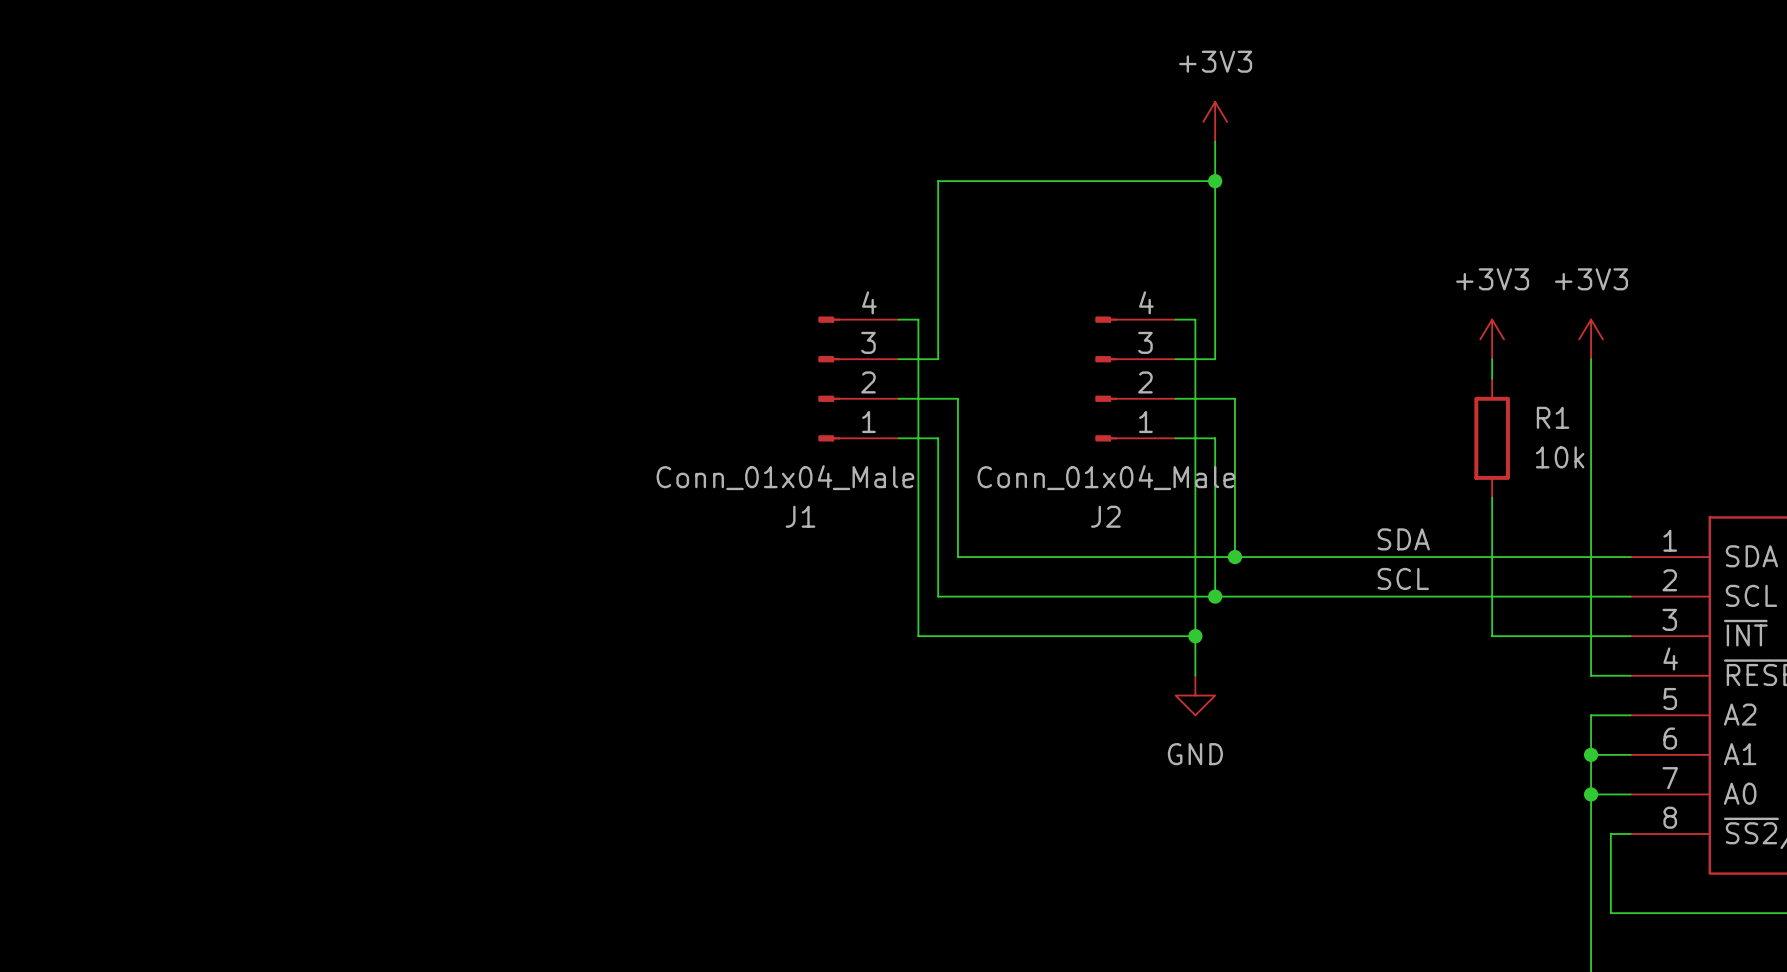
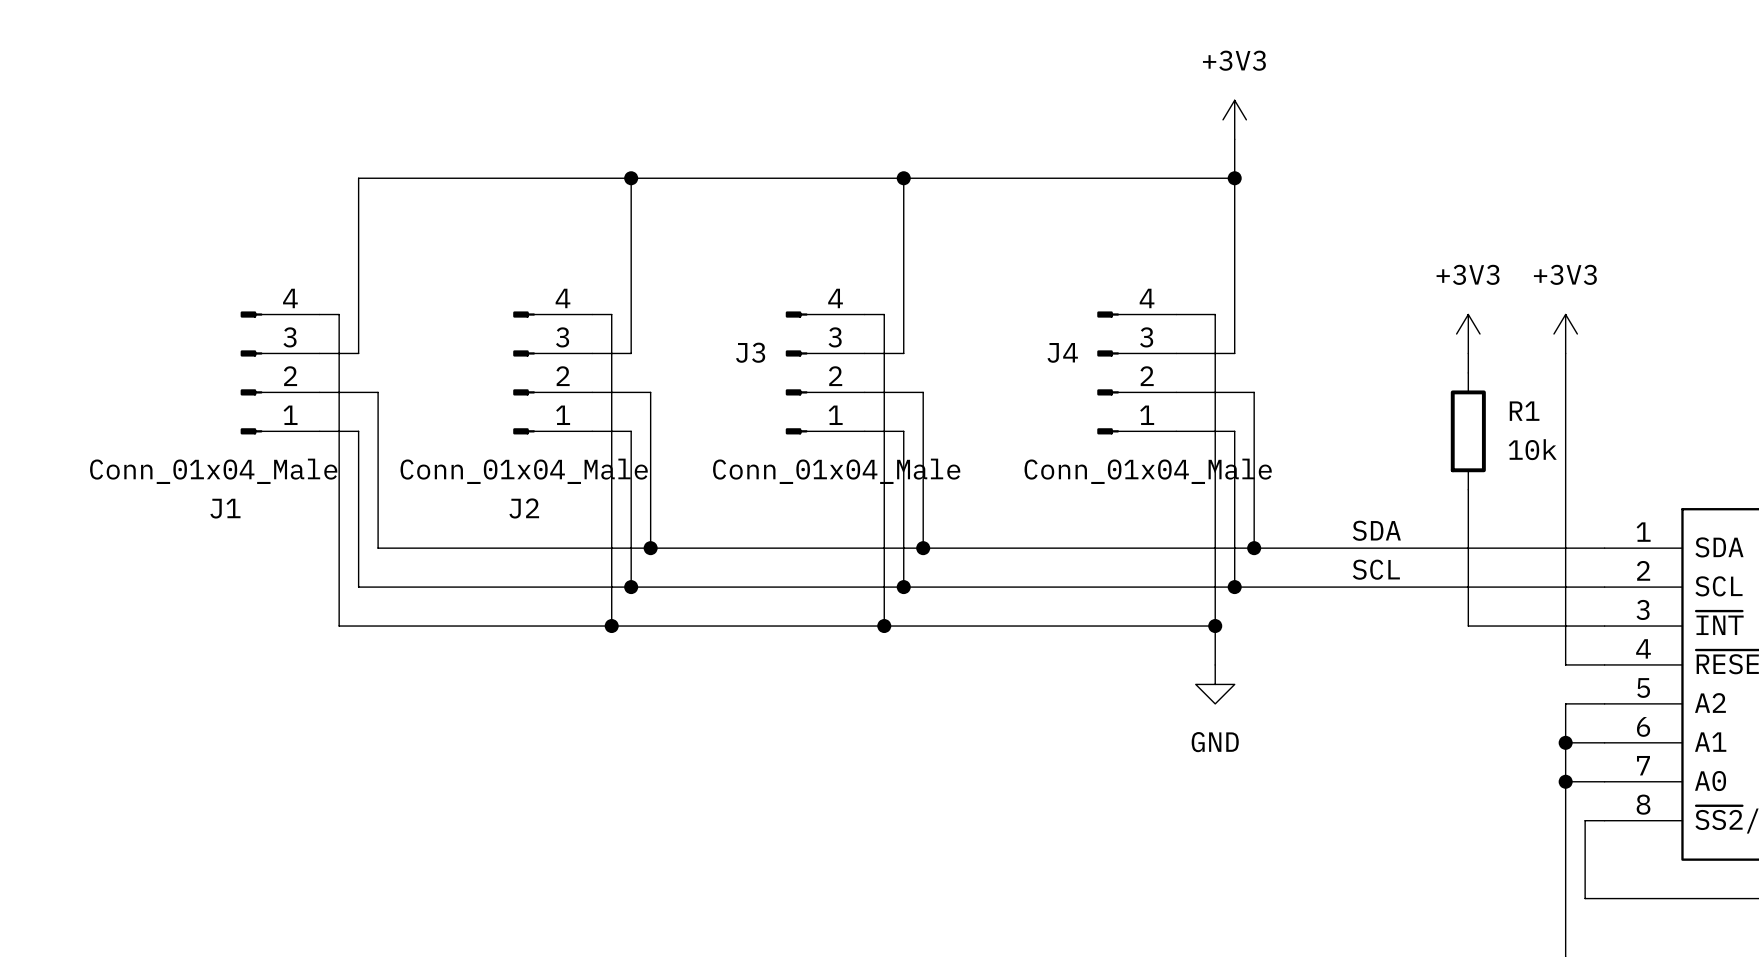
power symbol position: +3V3 (1215, 121) -> +3V3 (1234, 119)
wire: (1215, 141) (1215, 359) -> (1234, 139) (1234, 353) (1195, 353)
wire: none -> (631, 178) (631, 353) (592, 353)
junction: none -> (631, 178)
junction: none -> (903, 178)
wire: (938, 181) (938, 359) (918, 359) (918, 438) (938, 438) -> (923, 178) (358, 178) (358, 353) (319, 353)
wire: none -> (1195, 178) (1234, 178)
junction position: (1215, 181) -> (1234, 178)
wire: none -> (592, 314) (611, 314) (611, 626)
wire: none -> (864, 314) (884, 314) (884, 626)
wire: (898, 319) (918, 319) -> (903, 178) (903, 314)
wire: (1175, 319) (1195, 319) (1195, 675) -> none
wire: none -> (1176, 314) (1215, 314) (1215, 392) (1254, 392) (1254, 548)
J3: none -> Conn_01x04_Male (825, 372)
J1 position: (858, 378) -> (280, 372)
J2 position: (1135, 378) -> (552, 372)
J4: none -> Conn_01x04_Male (1136, 372)
wire: none -> (319, 392) (378, 392) (378, 548) (942, 548)
wire: none -> (592, 392) (650, 392) (650, 548)
wire: (938, 398) (957, 398) (957, 557) -> (923, 392) (923, 431)
wire: none -> (592, 431) (631, 431) (631, 587)
wire: (1215, 438) (1215, 596) -> (1195, 431) (1234, 431) (1234, 587)
junction: none -> (650, 548)
wire: (938, 557) (938, 596) -> (319, 431) (358, 431) (358, 587) (923, 587)
junction: none -> (923, 548)
wire: none -> (1215, 548) (1215, 664)
junction: (1234, 557) -> none
junction: none -> (1254, 548)
junction: none -> (631, 587)
wire: (918, 596) (918, 636) -> (319, 314) (339, 314) (339, 626) (903, 626)
junction: none -> (903, 587)
junction: (1215, 596) -> none
junction: none -> (1234, 587)
junction: none -> (611, 626)
junction: none -> (884, 626)
wire: none -> (1176, 626) (1215, 626)
junction: (1195, 636) -> none
junction: none -> (1215, 626)
power symbol position: GND (1195, 695) -> GND (1215, 684)

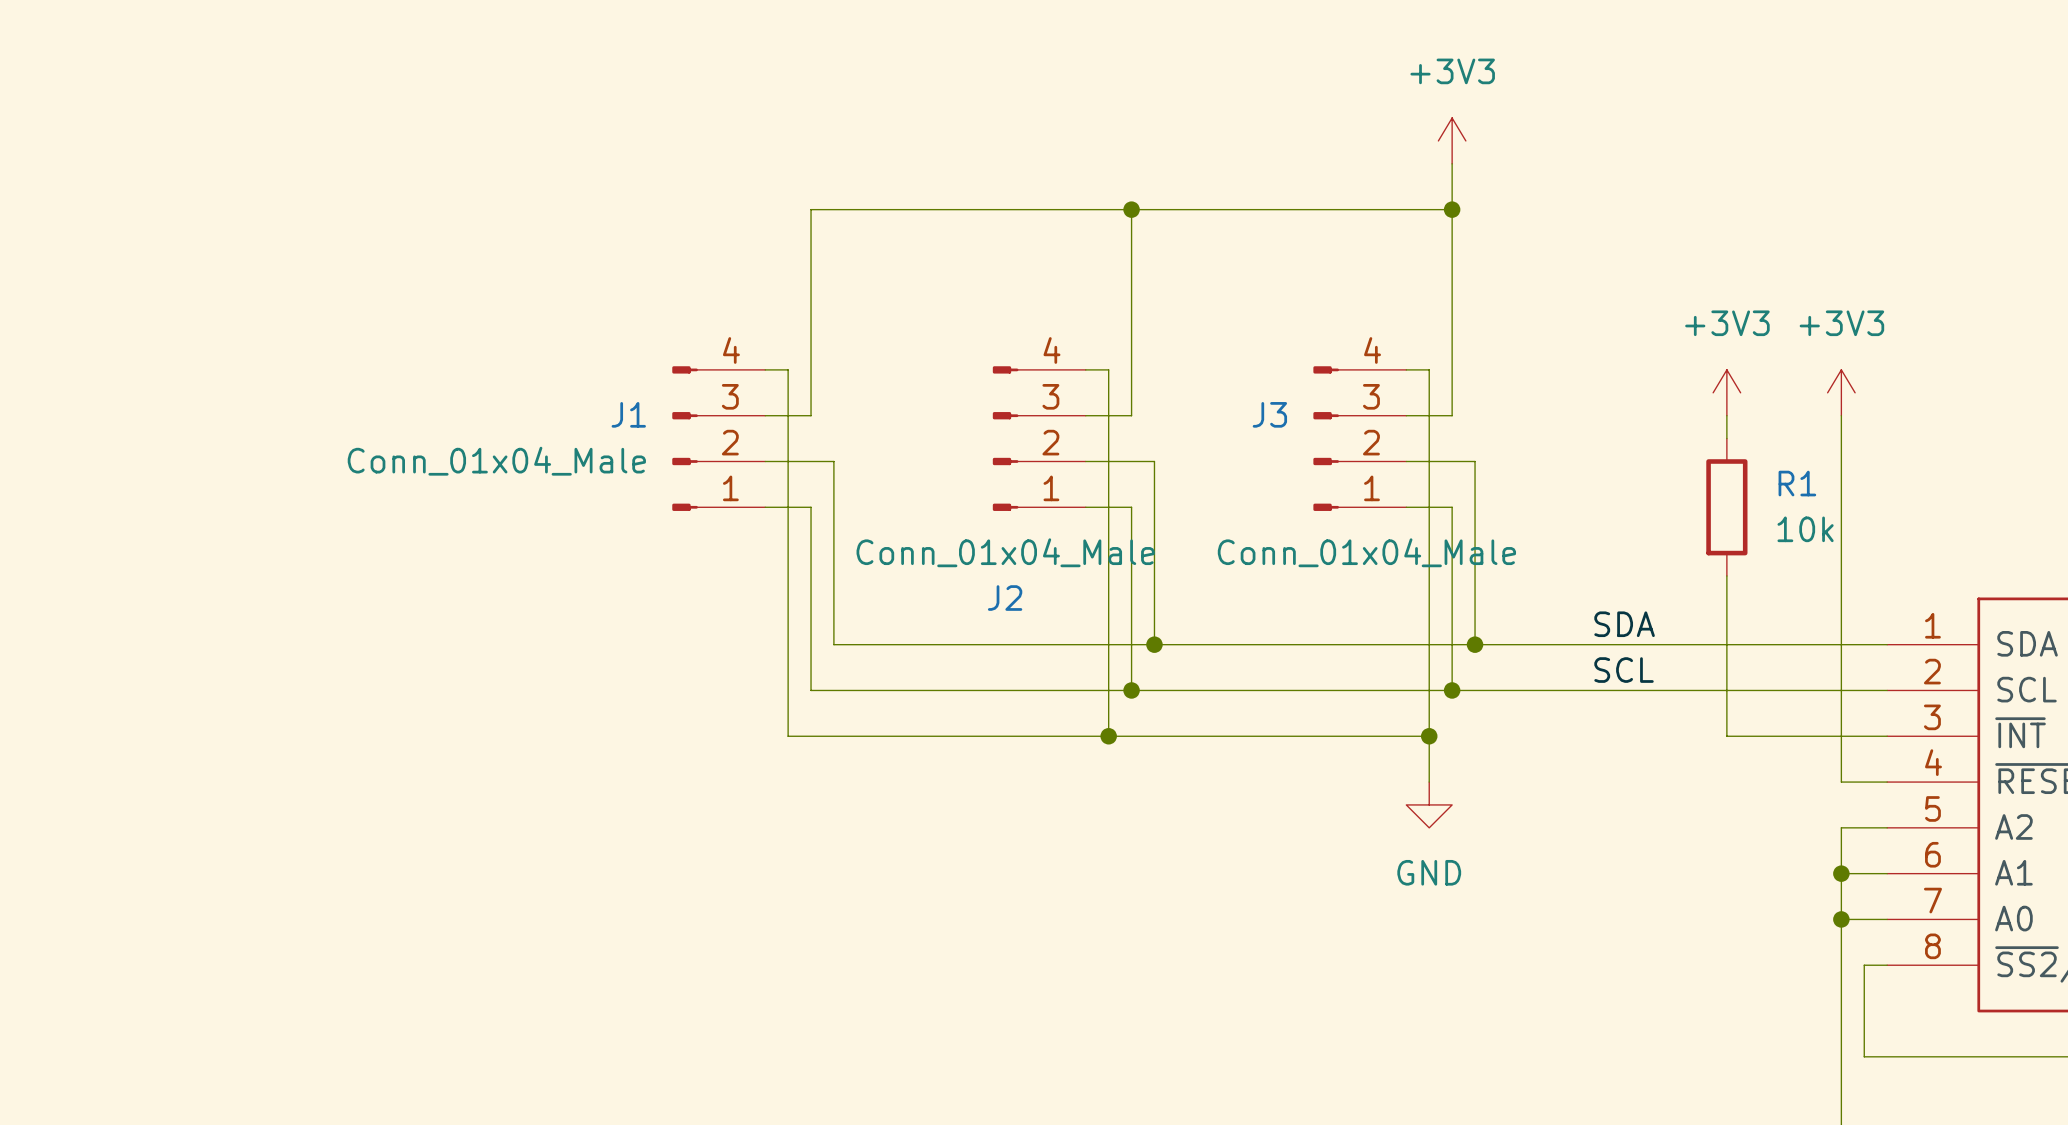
wire: (631, 178) (631, 353) (592, 353) -> none
junction: (631, 178) -> none
wire: (689, 178) (358, 178) (358, 353) (319, 353) -> (811, 209) (811, 415) (765, 415)
wire: (903, 178) (903, 353) (864, 353) -> (1131, 209) (1131, 415) (1085, 415)
junction position: (903, 178) -> (1131, 209)
wire: (319, 314) (339, 314) (339, 626) (670, 626) -> (765, 369) (788, 369) (788, 736)
wire: (592, 314) (611, 314) (611, 626) -> none
wire: (864, 314) (884, 314) (884, 626) -> (1085, 369) (1108, 369) (1108, 736)
J1 position: (280, 372) -> (718, 438)
J2 position: (552, 372) -> (1039, 438)
J3 position: (825, 372) -> (1359, 438)
J4: Conn_01x04_Male (1136, 372) -> none
wire: (319, 392) (378, 392) (378, 548) (709, 548) -> (765, 461) (833, 461) (833, 644)
wire: (592, 392) (650, 392) (650, 548) -> none
wire: (864, 392) (923, 392) (923, 548) -> (1085, 461) (1154, 461) (1154, 644)
wire: (319, 431) (358, 431) (358, 587) (689, 587) -> (765, 507) (811, 507) (811, 690)
wire: (592, 431) (631, 431) (631, 587) -> none
wire: (864, 431) (903, 431) (903, 587) -> (1085, 507) (1131, 507) (1131, 690)
J1 value position: Conn_01x04_Male (213, 471) -> Conn_01x04_Male (496, 461)
J1 name position: J1 (225, 508) -> J1 (628, 414)
junction: (650, 548) -> none
junction: (923, 548) -> none
junction: none -> (1154, 644)
junction: (631, 587) -> none
junction: (903, 587) -> none
junction: none -> (1131, 690)
junction: (611, 626) -> none
junction: (884, 626) -> none
junction: none -> (1108, 736)

